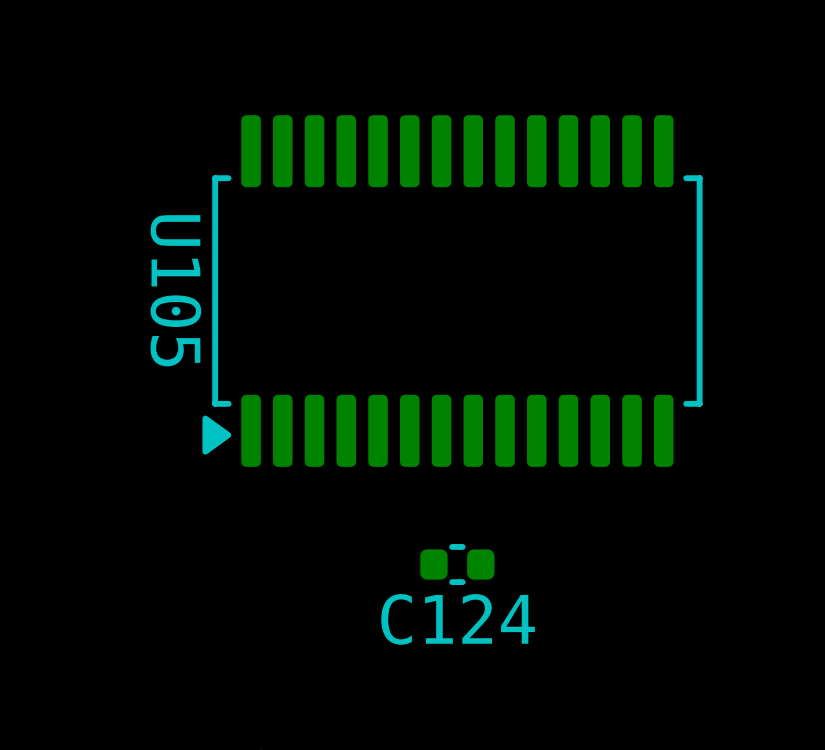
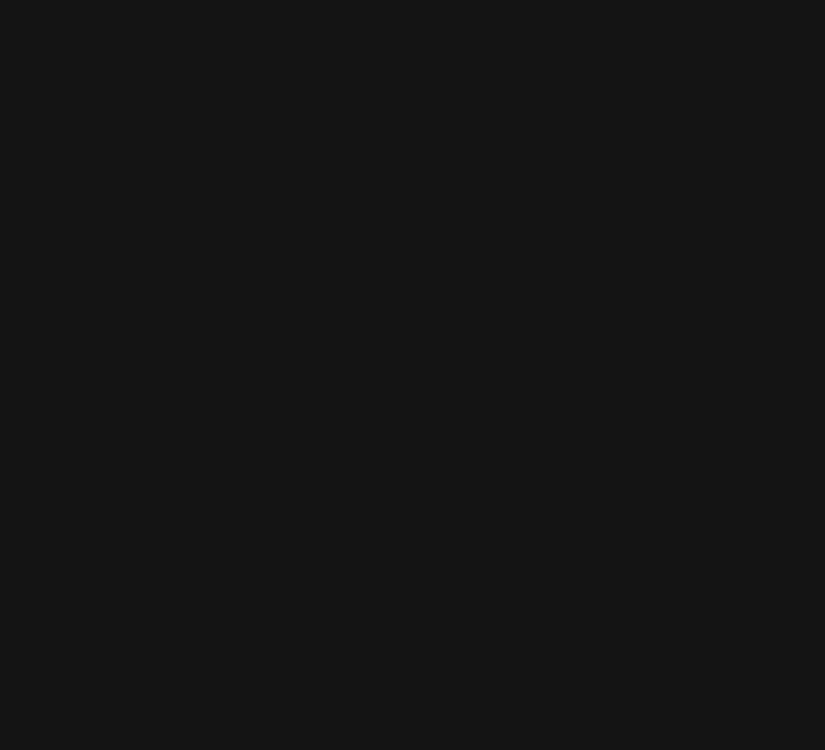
U105: (452, 291) -> none
C124: (457, 564) -> none

